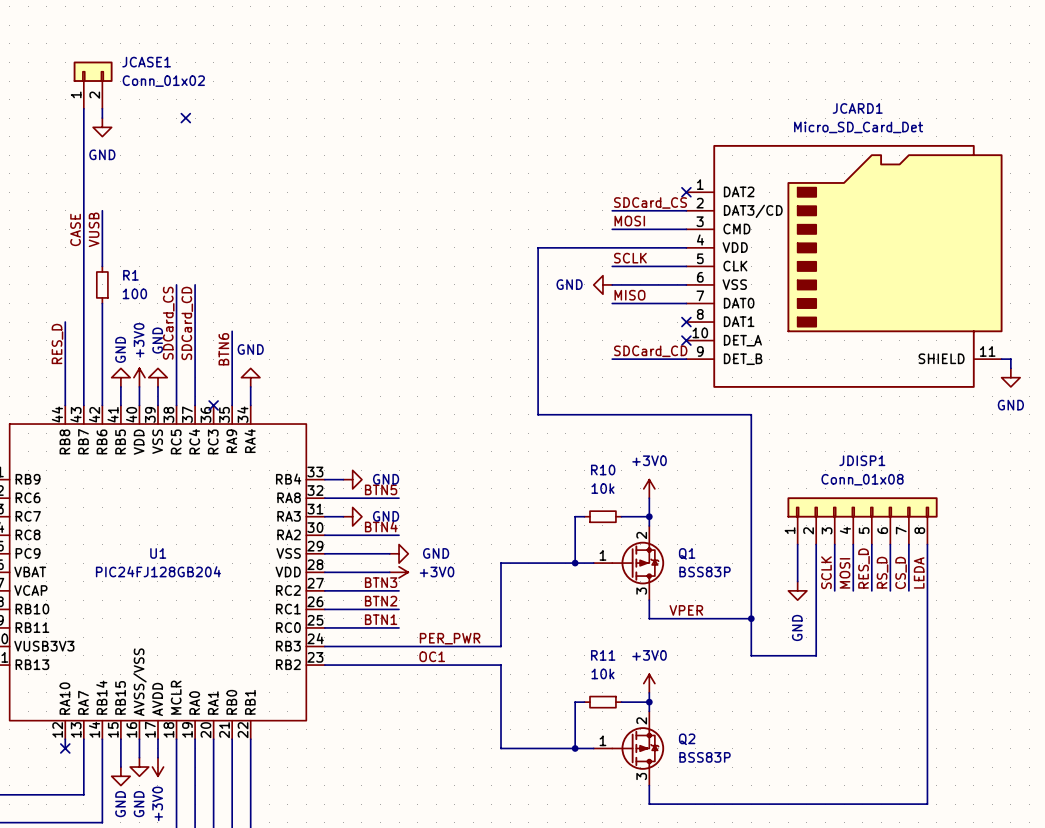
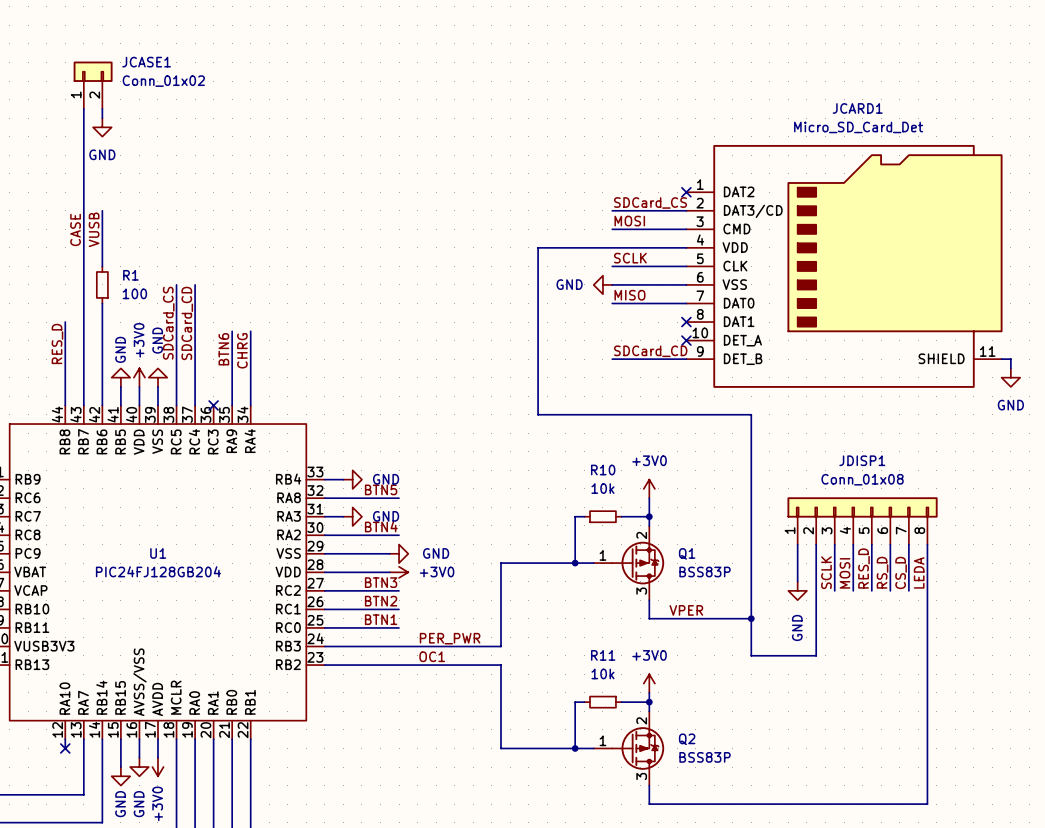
no-connect mark: (185, 118) -> none
wire: none -> (250, 331) (250, 386)
label: none -> CHRG (242, 350)
power symbol: GND (250, 377) -> none

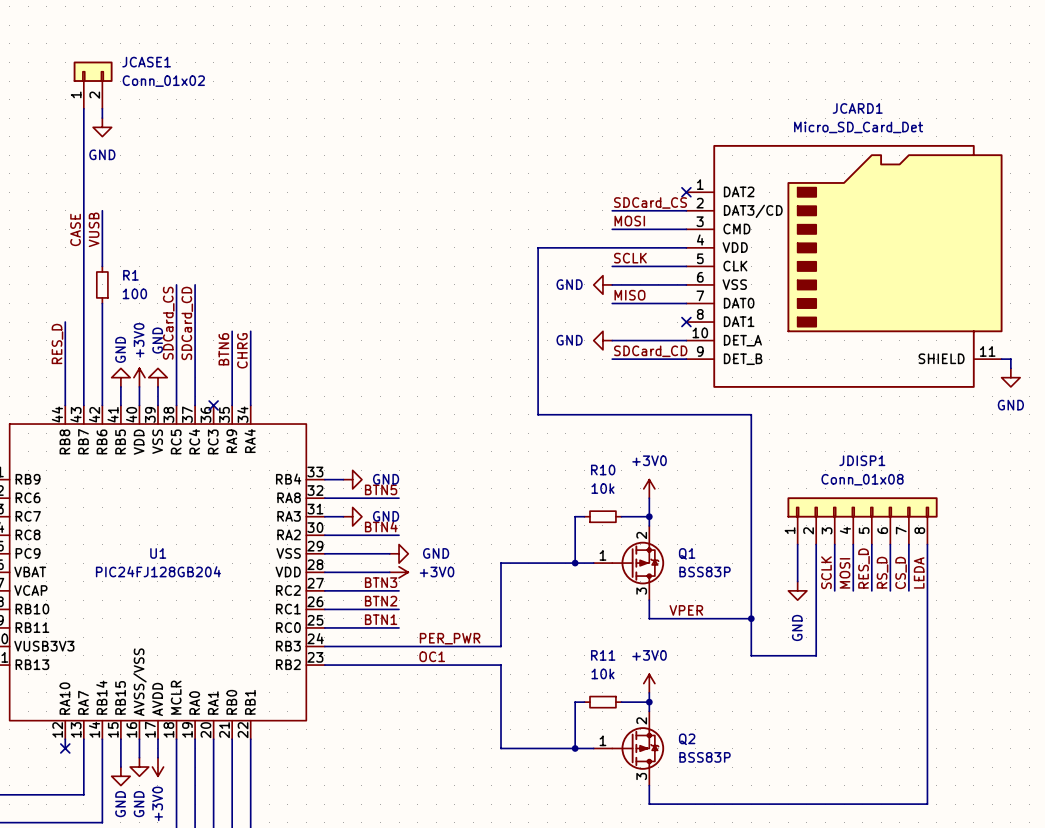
power symbol: none -> GND (602, 340)
wire: none -> (612, 340) (686, 340)
no-connect mark: (686, 340) -> none

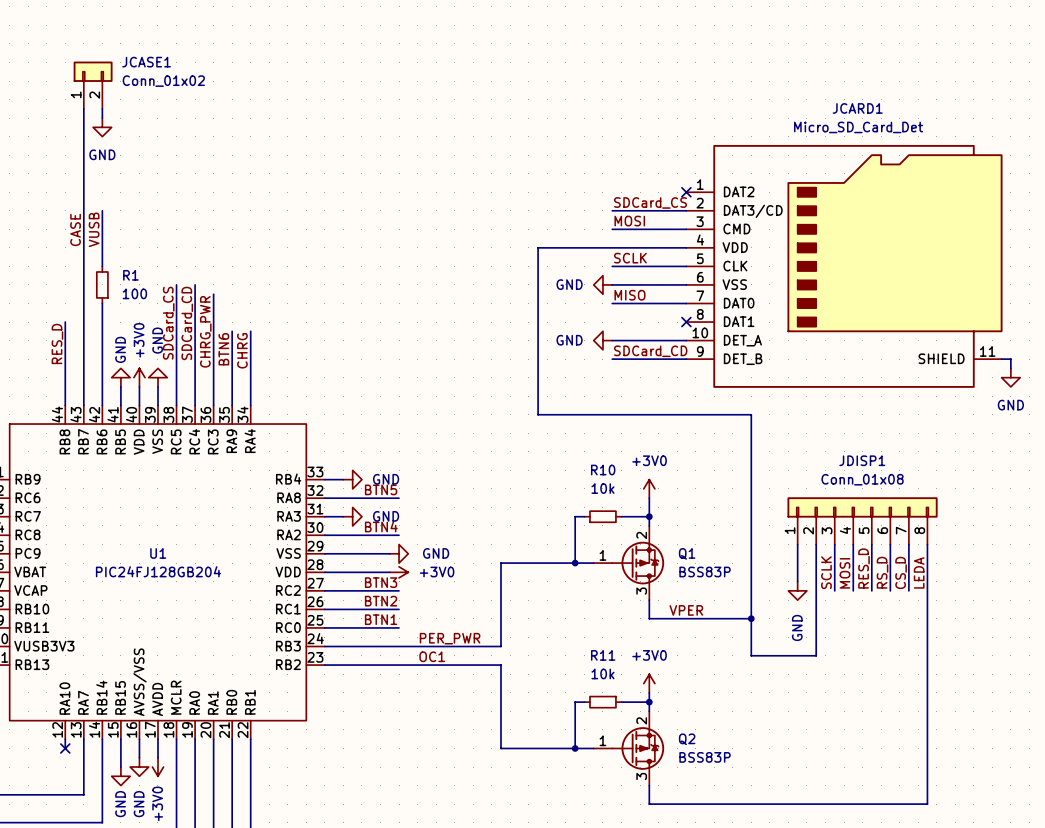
wire: none -> (213, 294) (213, 405)
label: none -> CHRG_PWR (205, 331)
no-connect mark: (213, 405) -> none

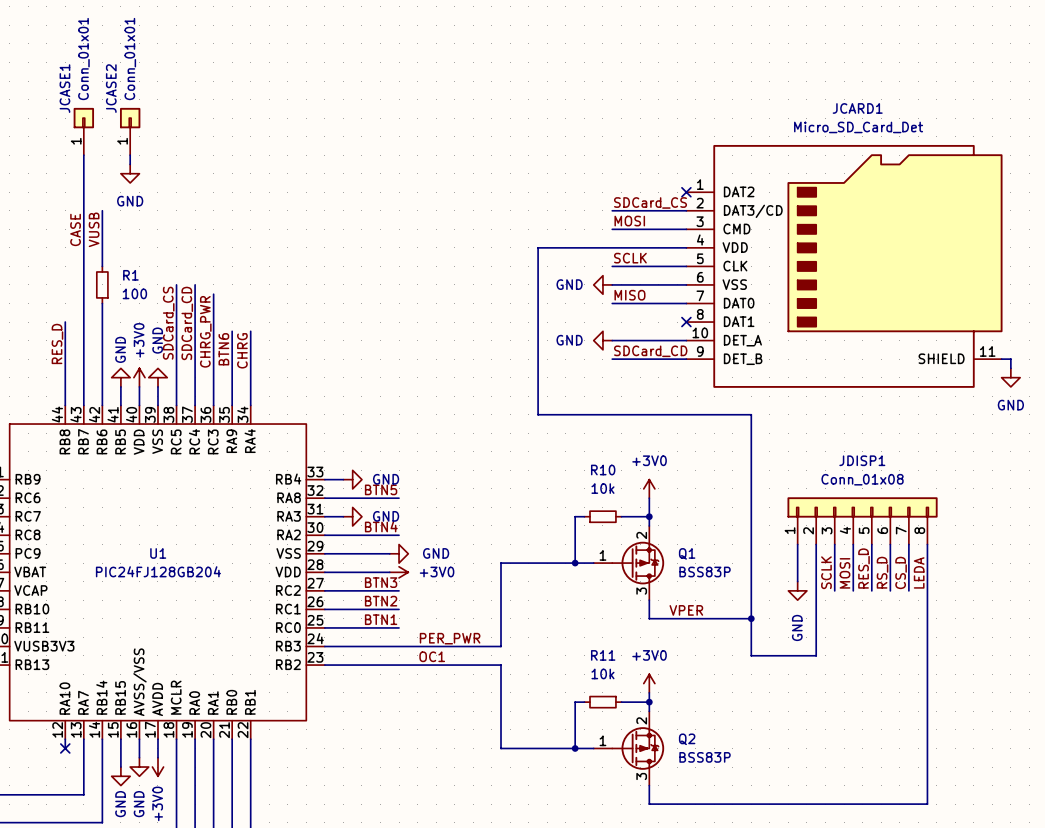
JCASE1 symbol: [73, 61, 113, 109] -> [73, 107, 95, 156]
JCASE1 name position: JCASE1 (146, 62) -> JCASE1 (64, 88)
JCASE1 value: Conn_01x02 (163, 81) -> Conn_01x01 (83, 59)
wire: (102, 108) (102, 118) -> (130, 155) (130, 164)
power symbol position: GND (102, 127) -> GND (130, 173)
JCASE2: none -> Conn_01x01 (130, 131)

